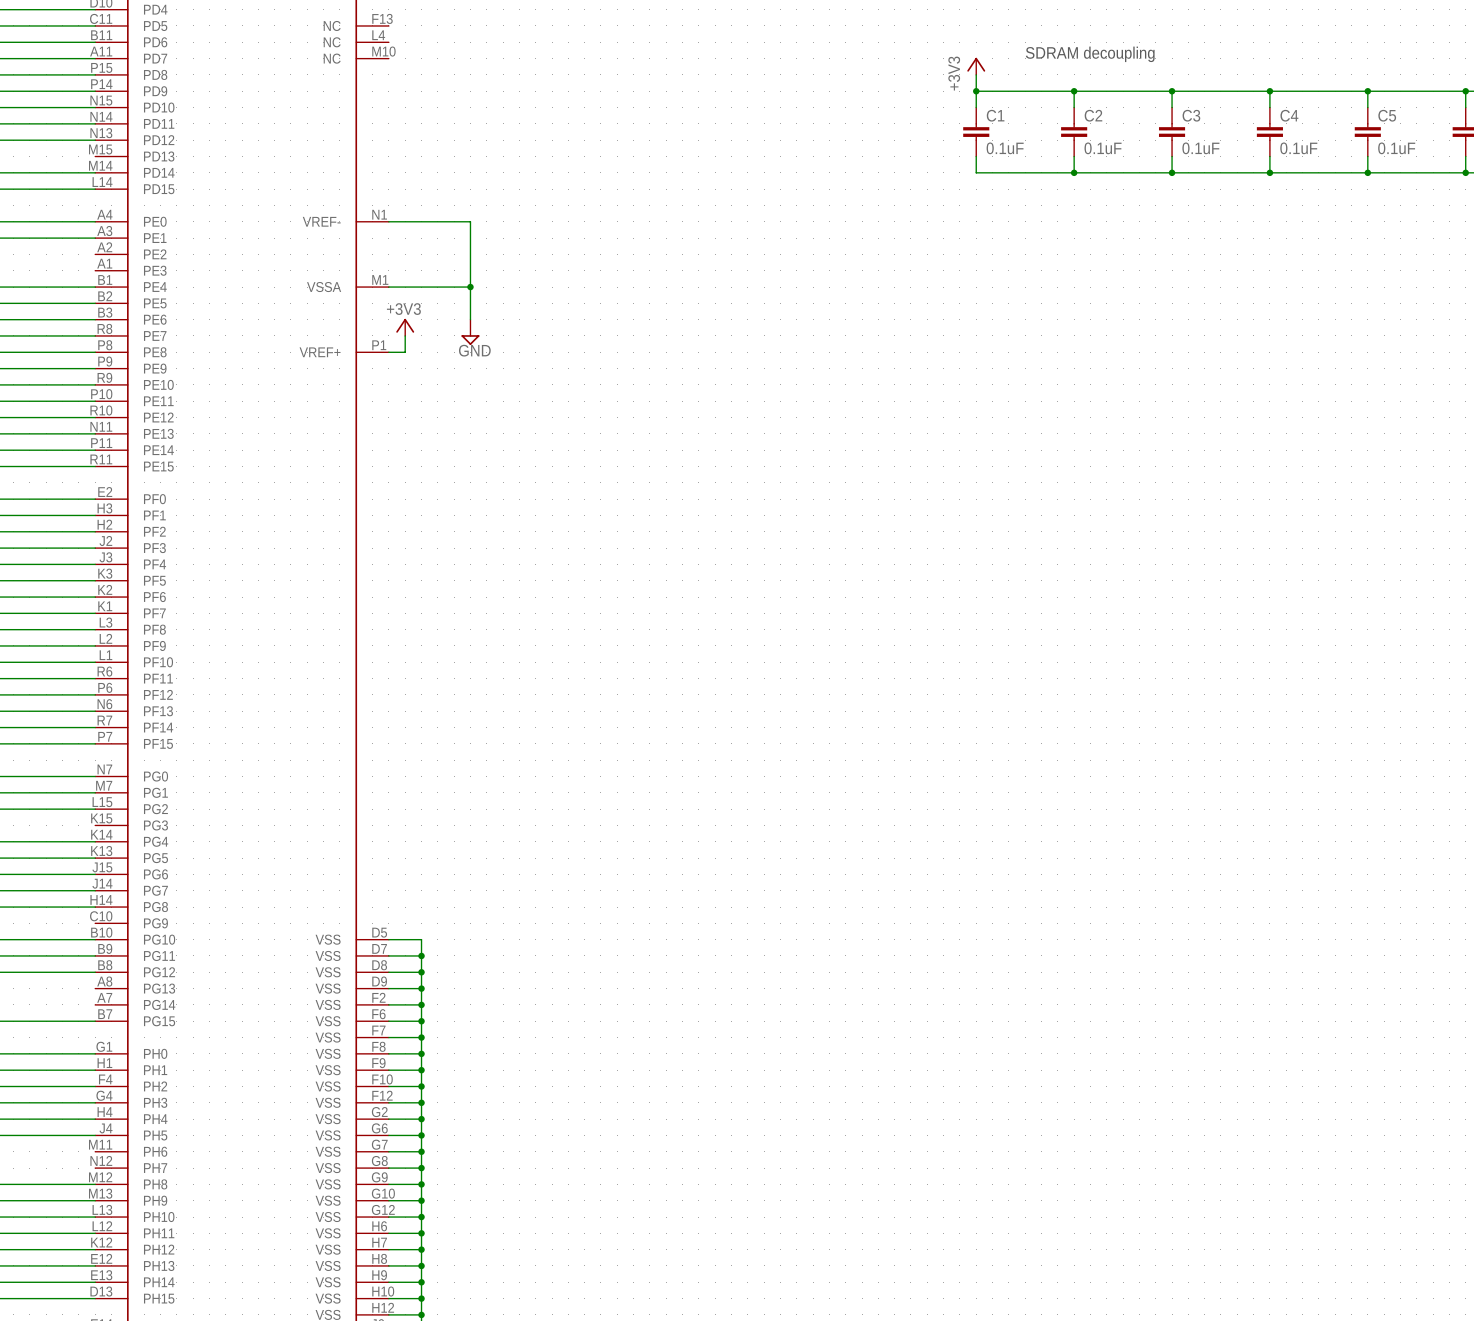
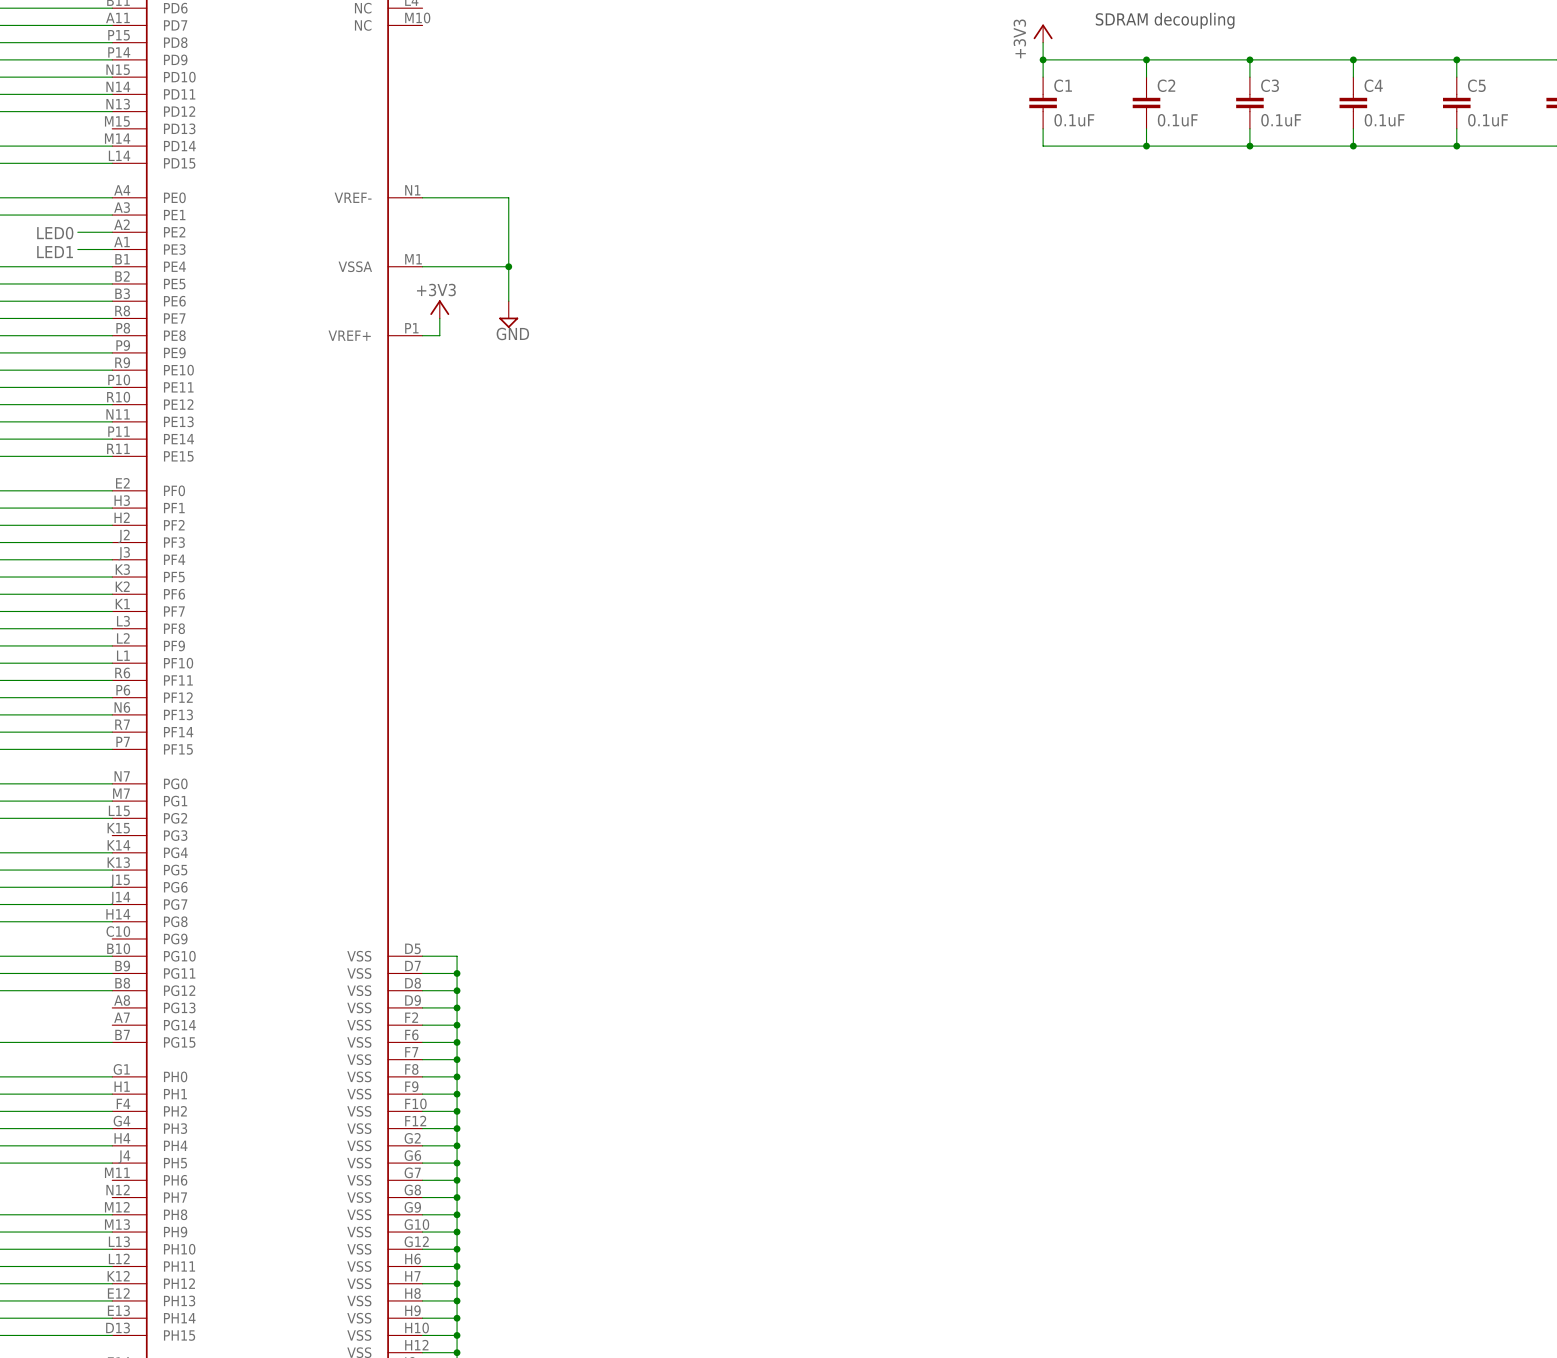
wire: none -> (77, 232) (112, 232)
label: none -> LED0 (55, 233)
wire: none -> (77, 249) (112, 249)
label: none -> LED1 (55, 252)

